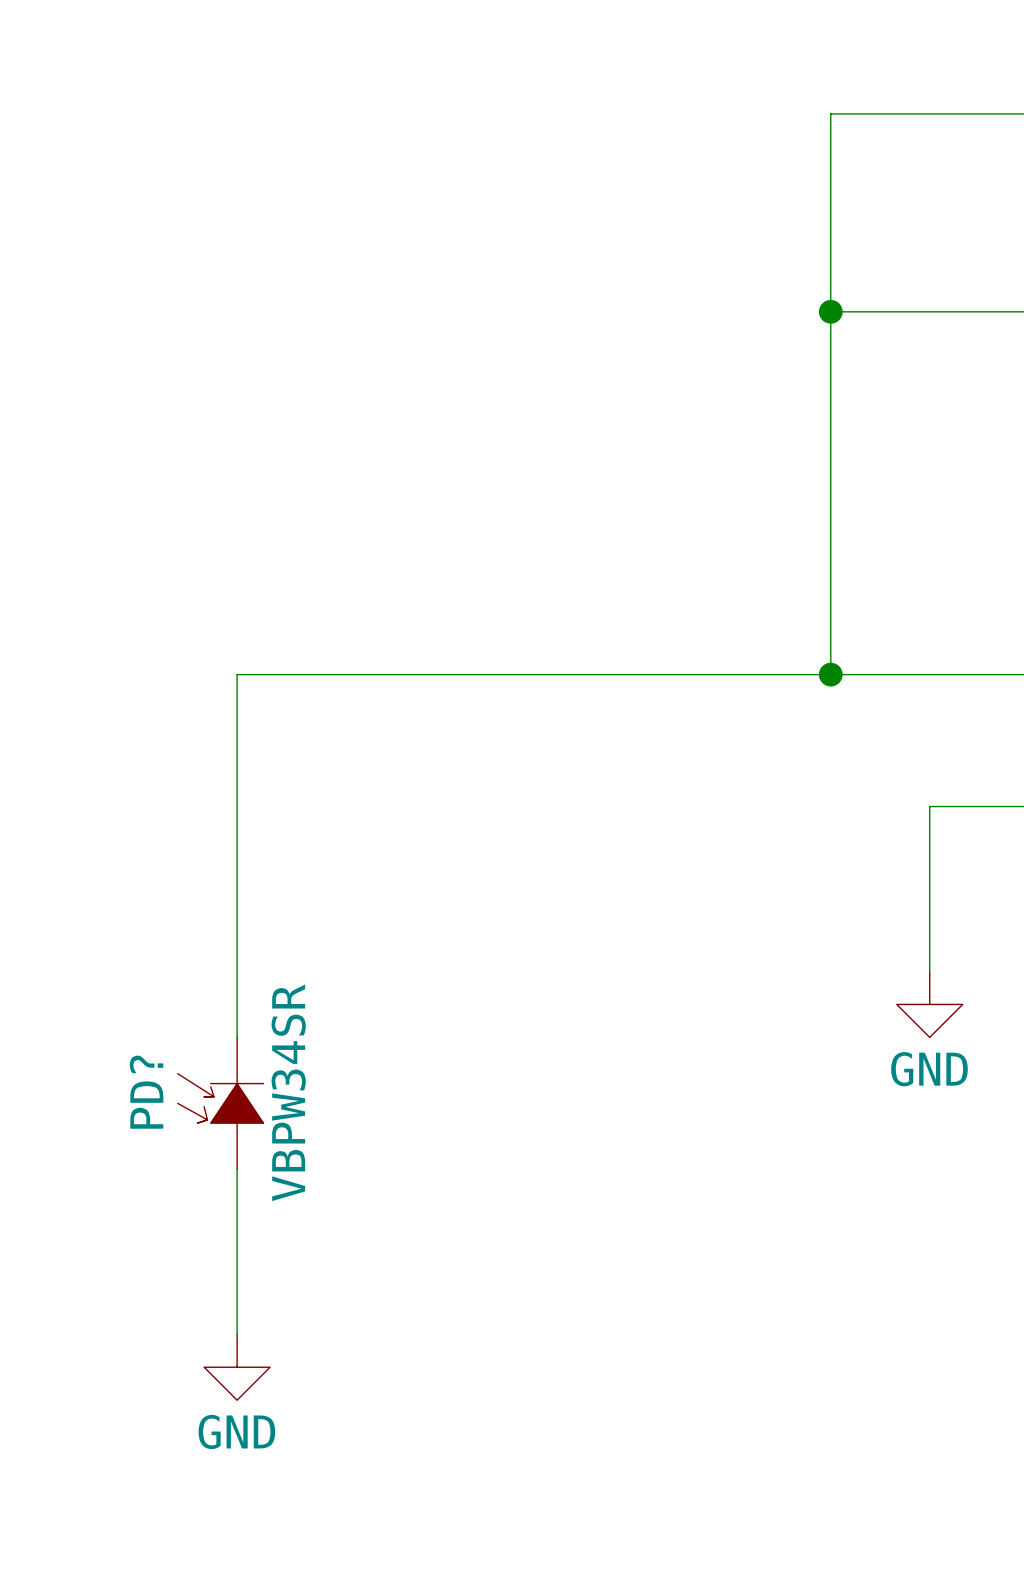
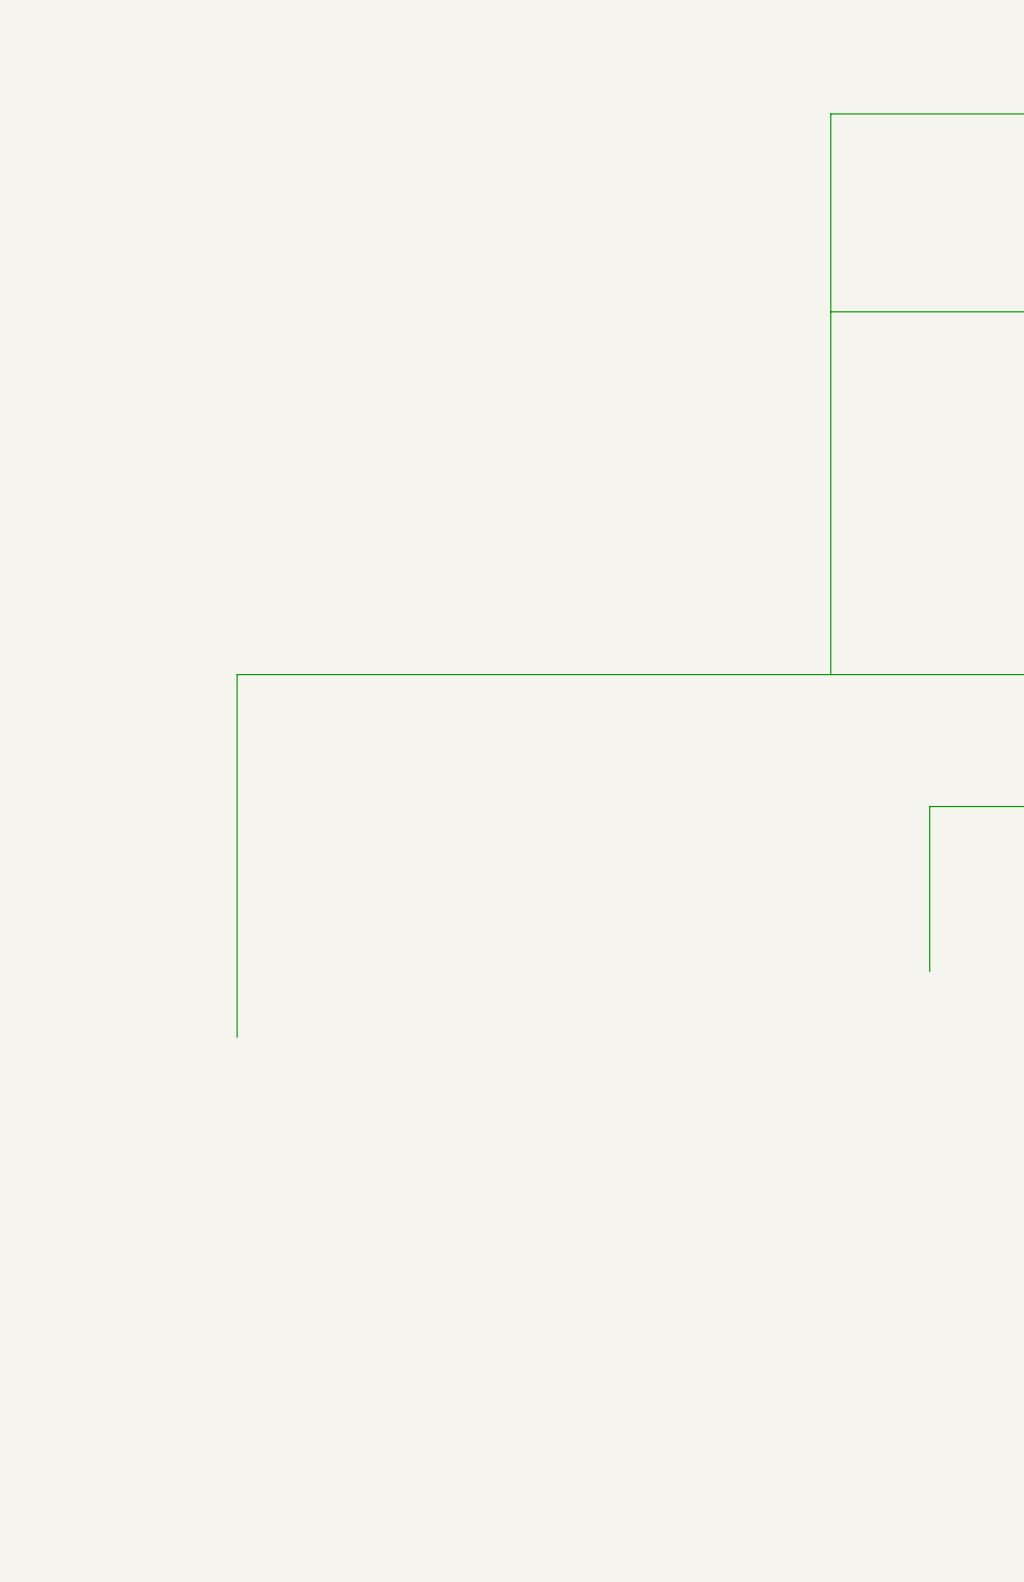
junction: (830, 311) -> none
junction: (830, 674) -> none
power symbol: GND (929, 1004) -> none
PD?: VBPW34SR (220, 1103) -> none
wire: (237, 1169) (237, 1334) -> none
power symbol: GND (237, 1367) -> none

